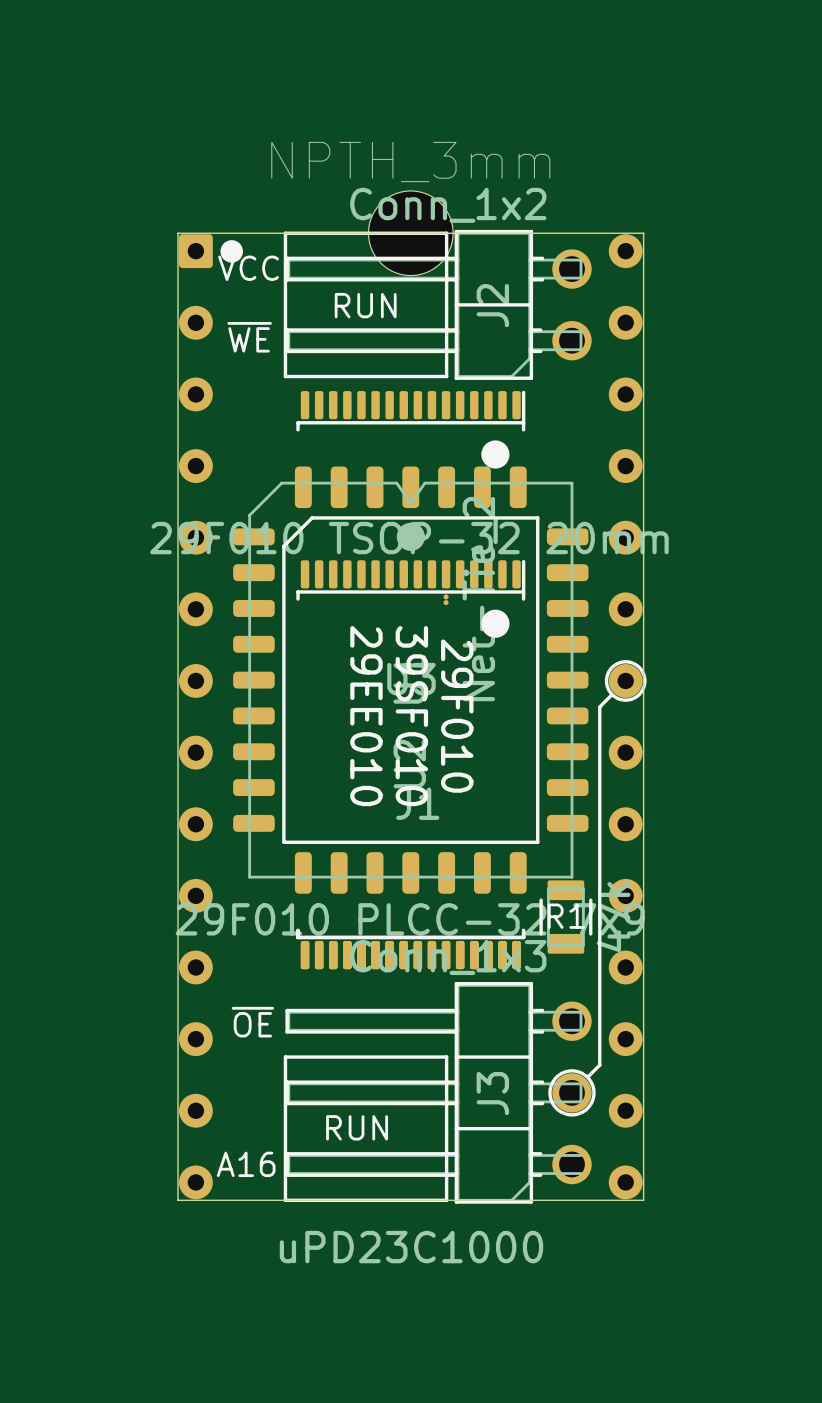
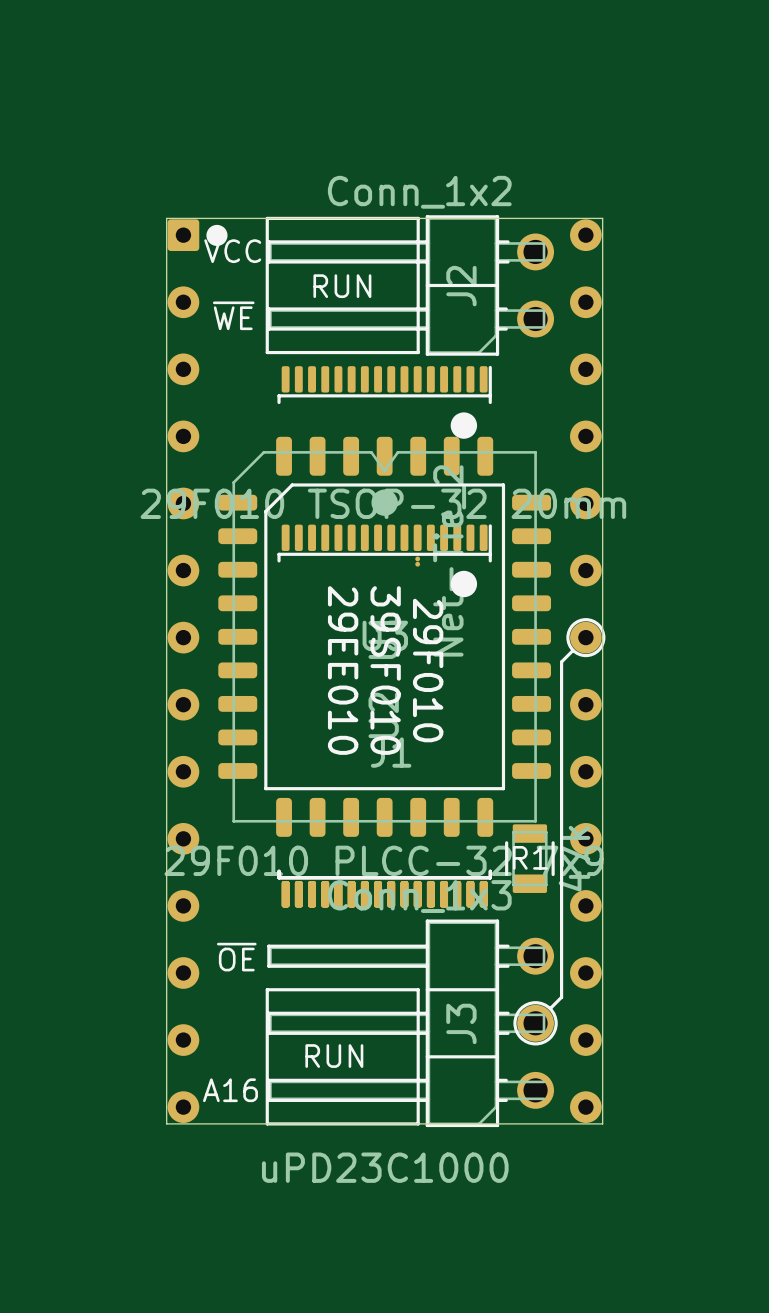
part: NPTH_3mm (410, 233) -> none

